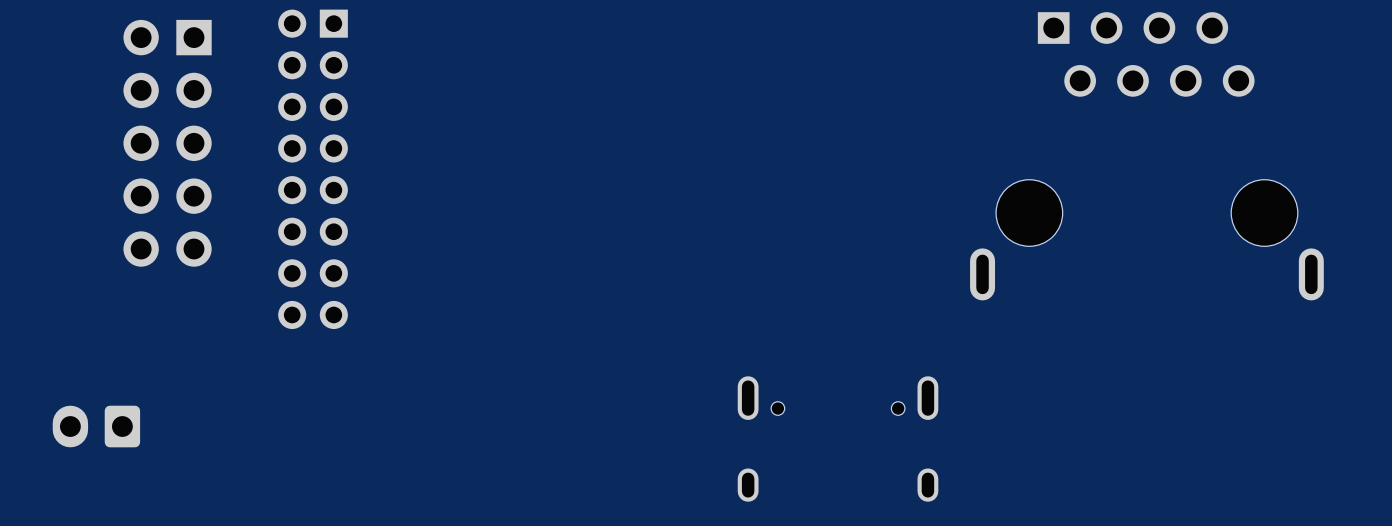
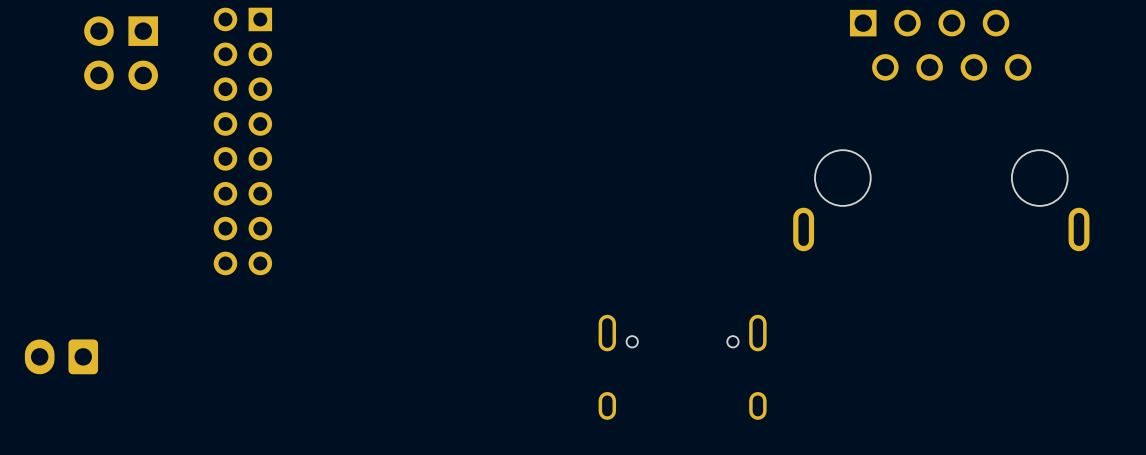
part: (167, 143) -> none

